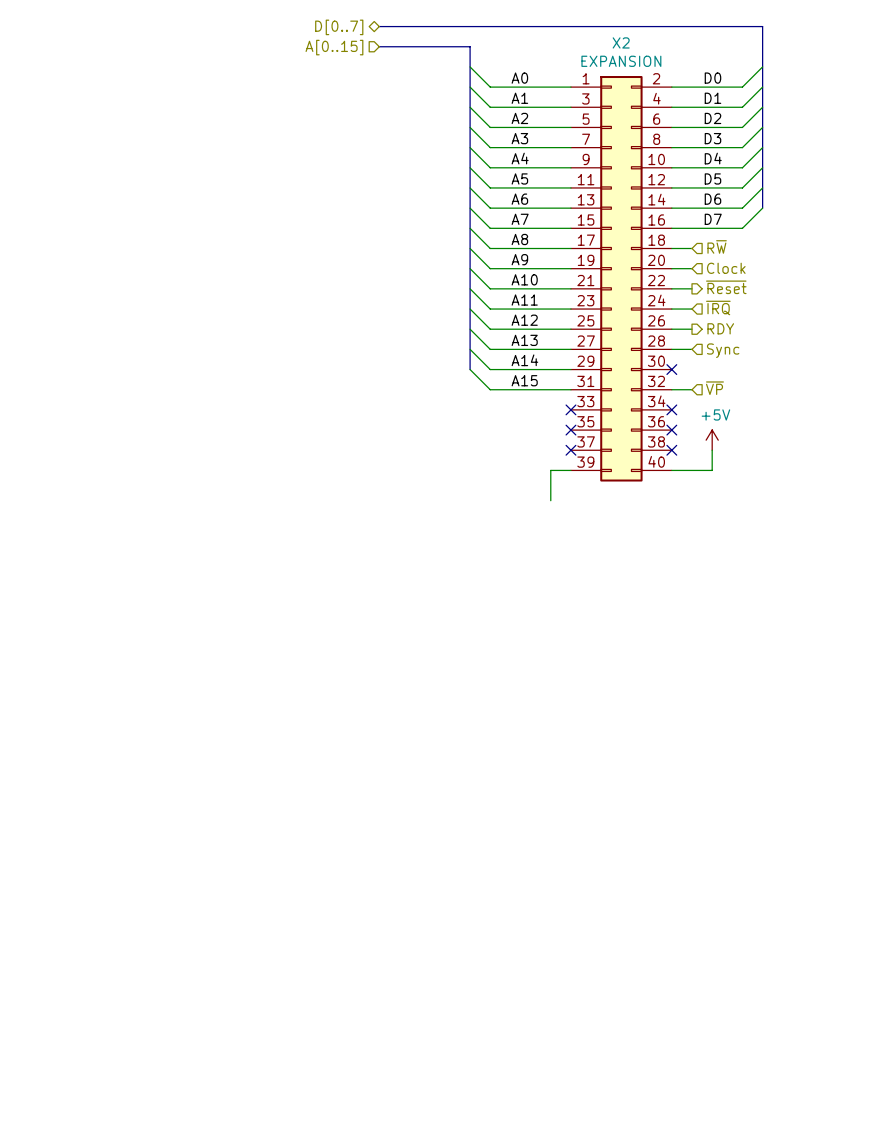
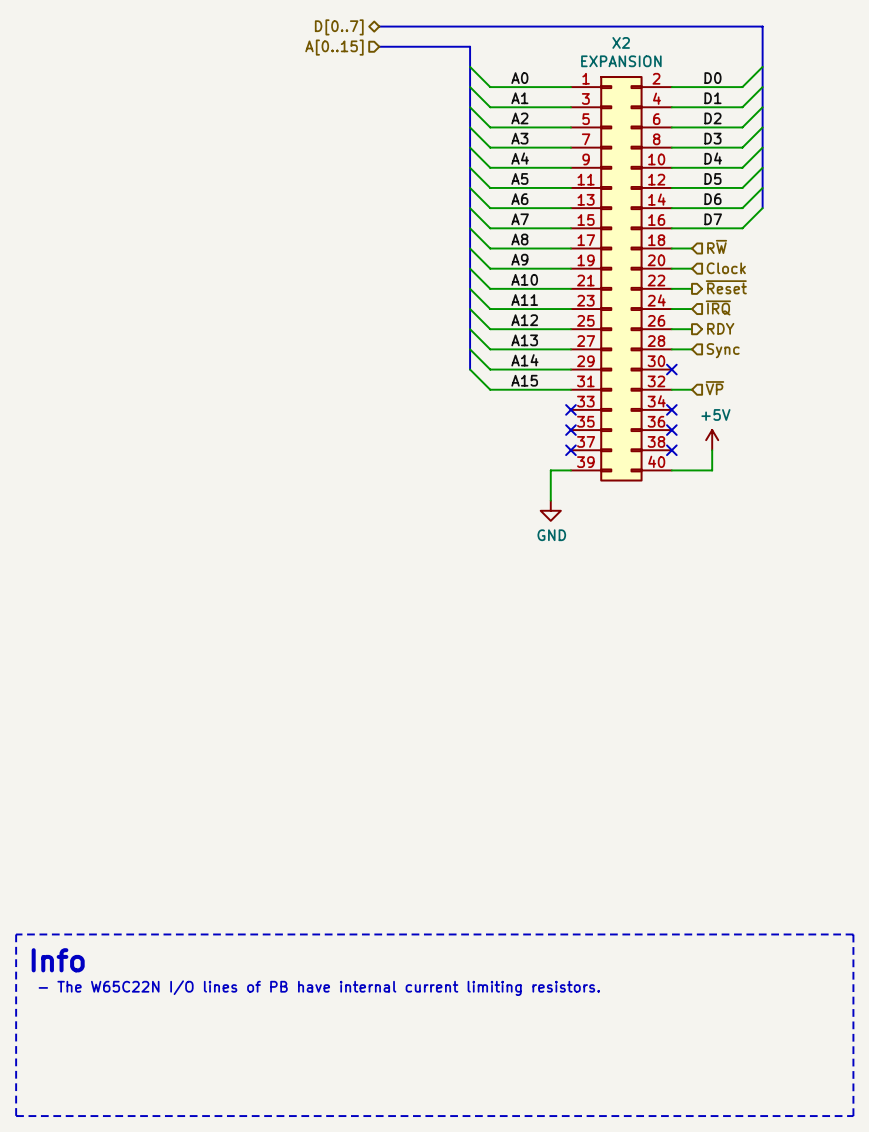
power symbol: none -> GND (550, 510)
line: none -> (16, 934) (853, 934) (853, 1116) (16, 1116) (16, 934)
text: none -> Info (58, 960)
text: none -> - The W65C22N I/O lines of PB have internal current limiting resistors. (319, 988)

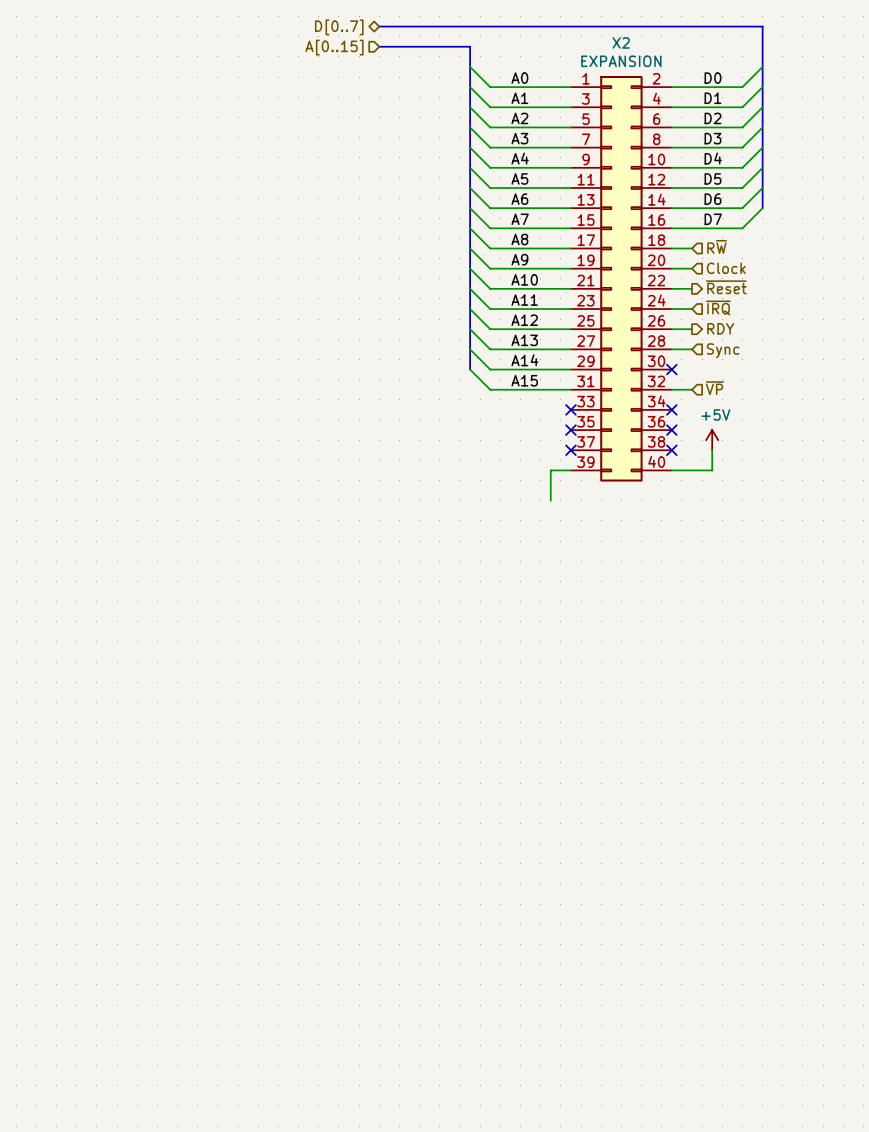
power symbol: GND (550, 510) -> none
line: (16, 934) (853, 934) (853, 1116) (16, 1116) (16, 934) -> none
text: Info (58, 960) -> none
text: - The W65C22N I/O lines of PB have internal current limiting resistors. (319, 988) -> none

